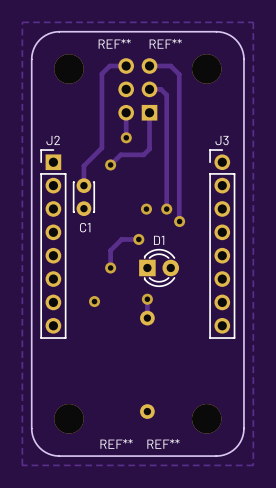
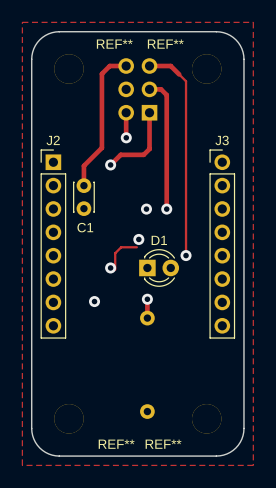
track: (179, 74) (179, 221) -> (179, 74) (186, 81) (186, 255)
via position: (179, 221) -> (186, 255)
track: (138, 239) (121, 239) (110, 250) (110, 267) -> none
track: none -> (136, 247) (121, 247) (115, 253) (115, 269)

